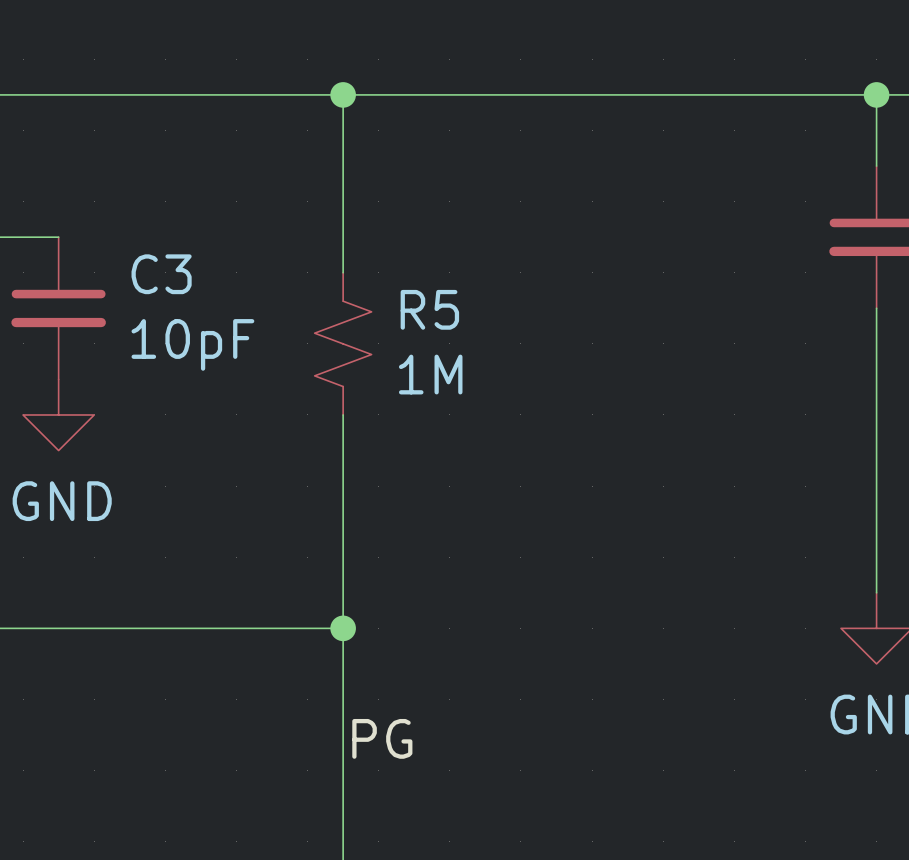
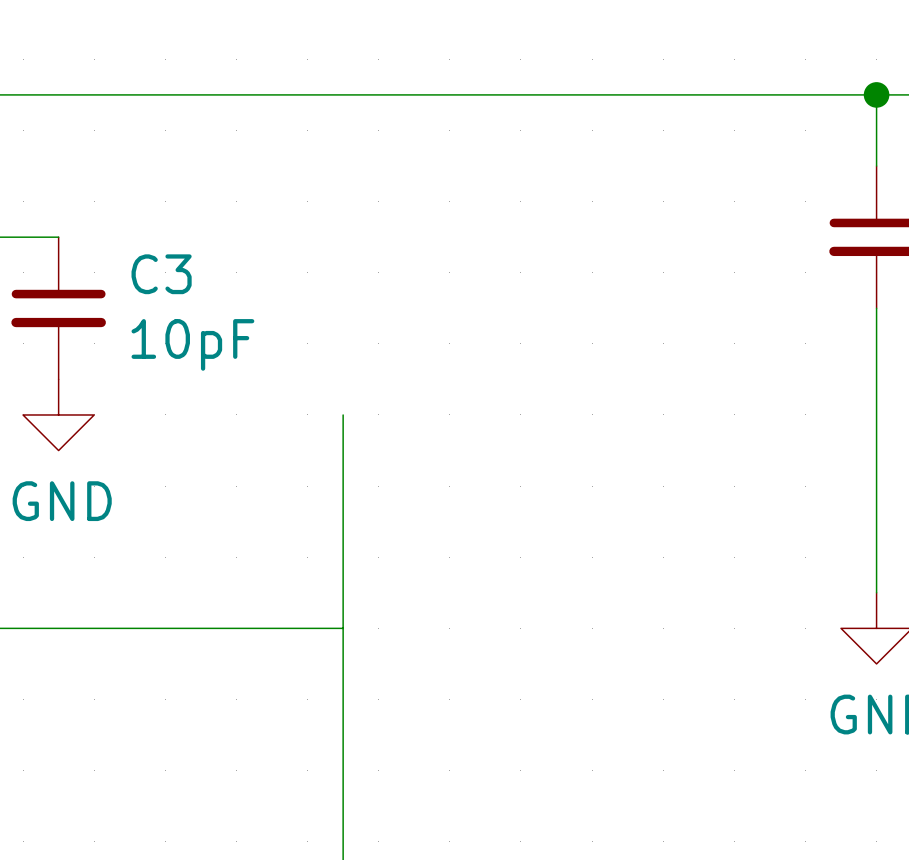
wire: (343, 94) (343, 272) -> none
junction: (343, 94) -> none
R5: 1M (343, 343) -> none
junction: (343, 628) -> none
label: PG (382, 738) -> none

